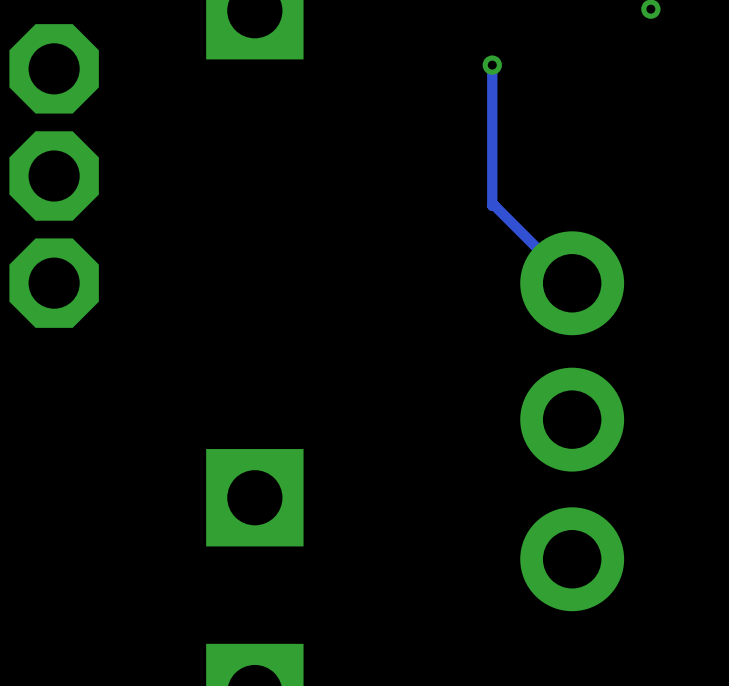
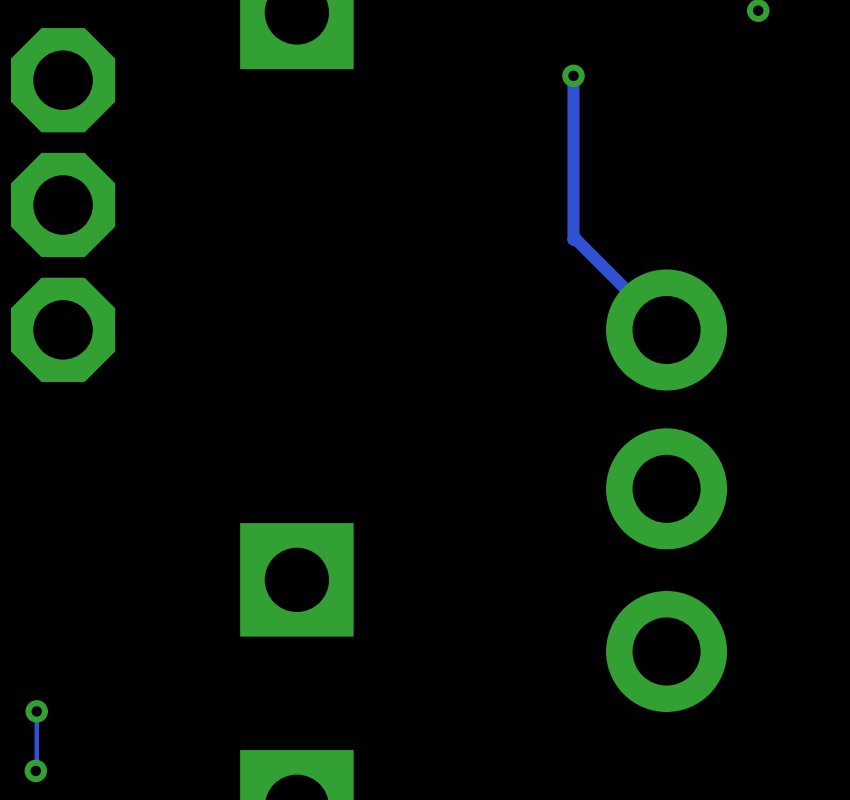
track: none -> (36, 711) (35, 770)
via: none -> (36, 711)
via: none -> (35, 770)

